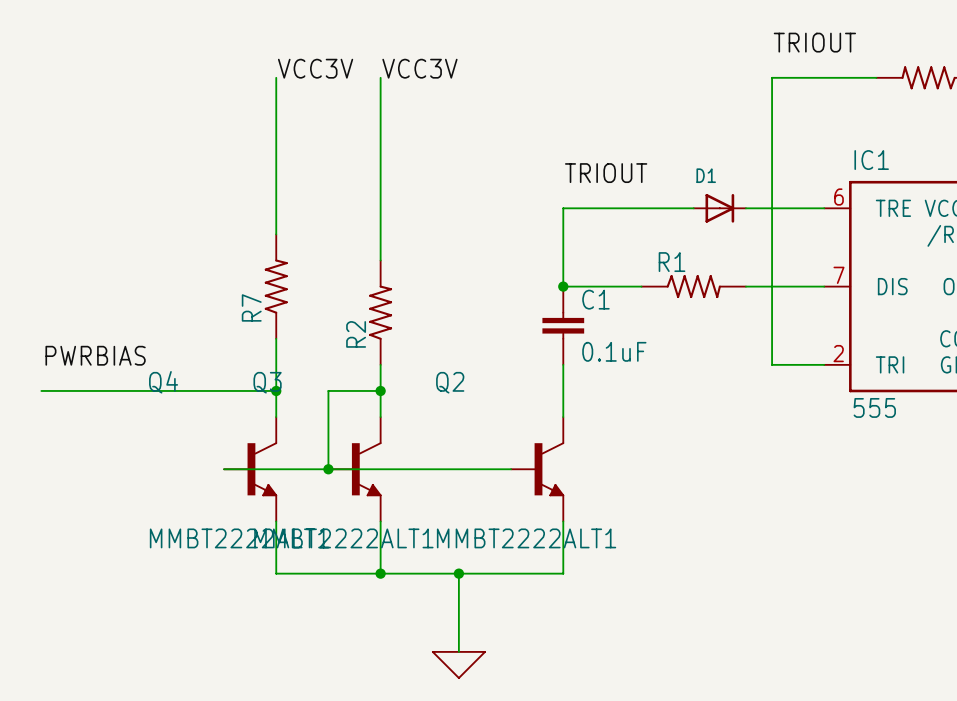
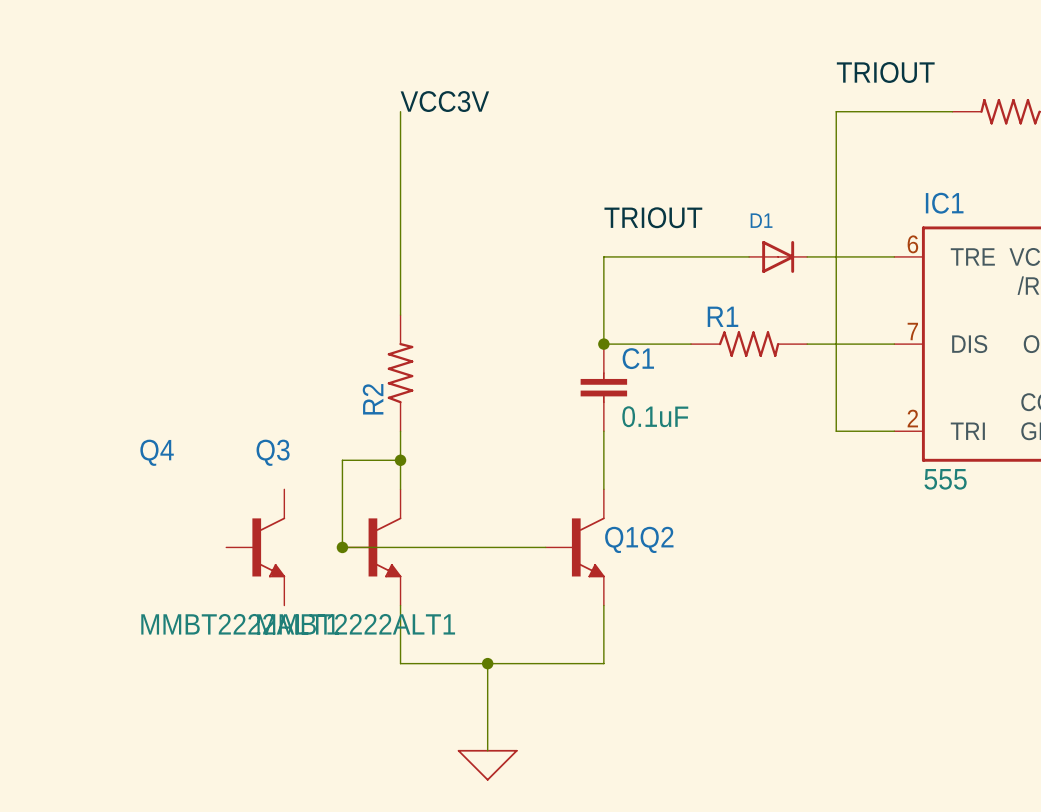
label: VCC3V (315, 68) -> none
wire: (276, 77) (276, 234) -> none
R7: (276, 286) -> none
wire: (276, 338) (276, 417) -> none
label: PWRBIAS (95, 355) -> none
Q2 name: Q2 (450, 382) -> Q1Q2 (639, 539)
wire: (41, 390) (276, 390) -> none
junction: (276, 390) -> none
wire: (224, 469) (328, 469) -> none
wire: (276, 521) (276, 573) (380, 573) -> none
Q2 value: MMBT2222ALT1 (526, 538) -> none
junction: (380, 573) -> none

